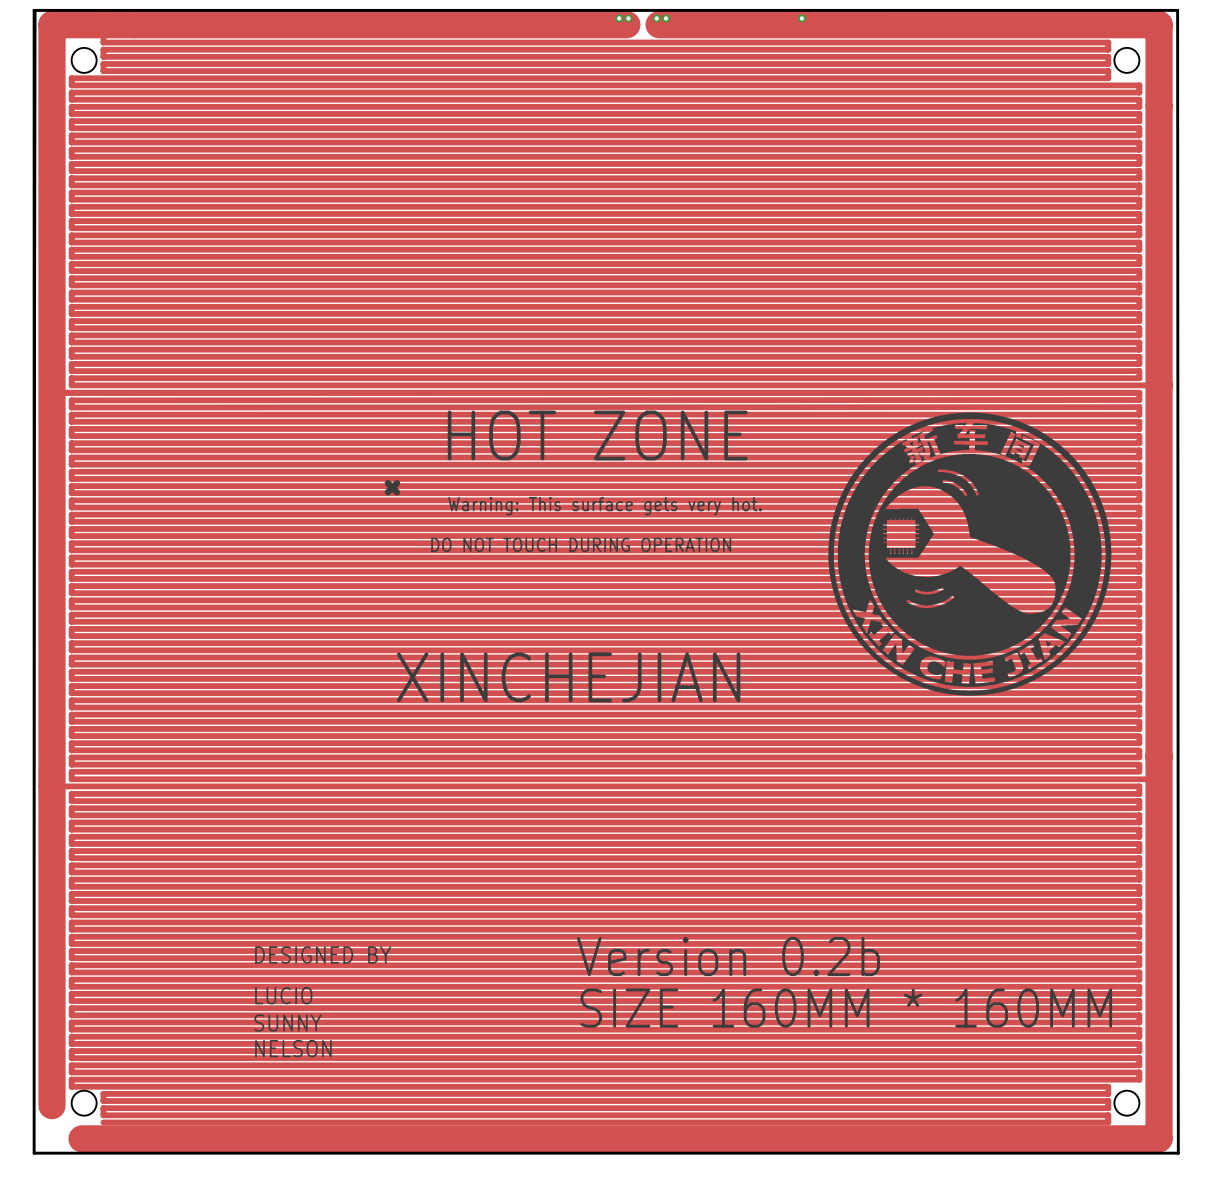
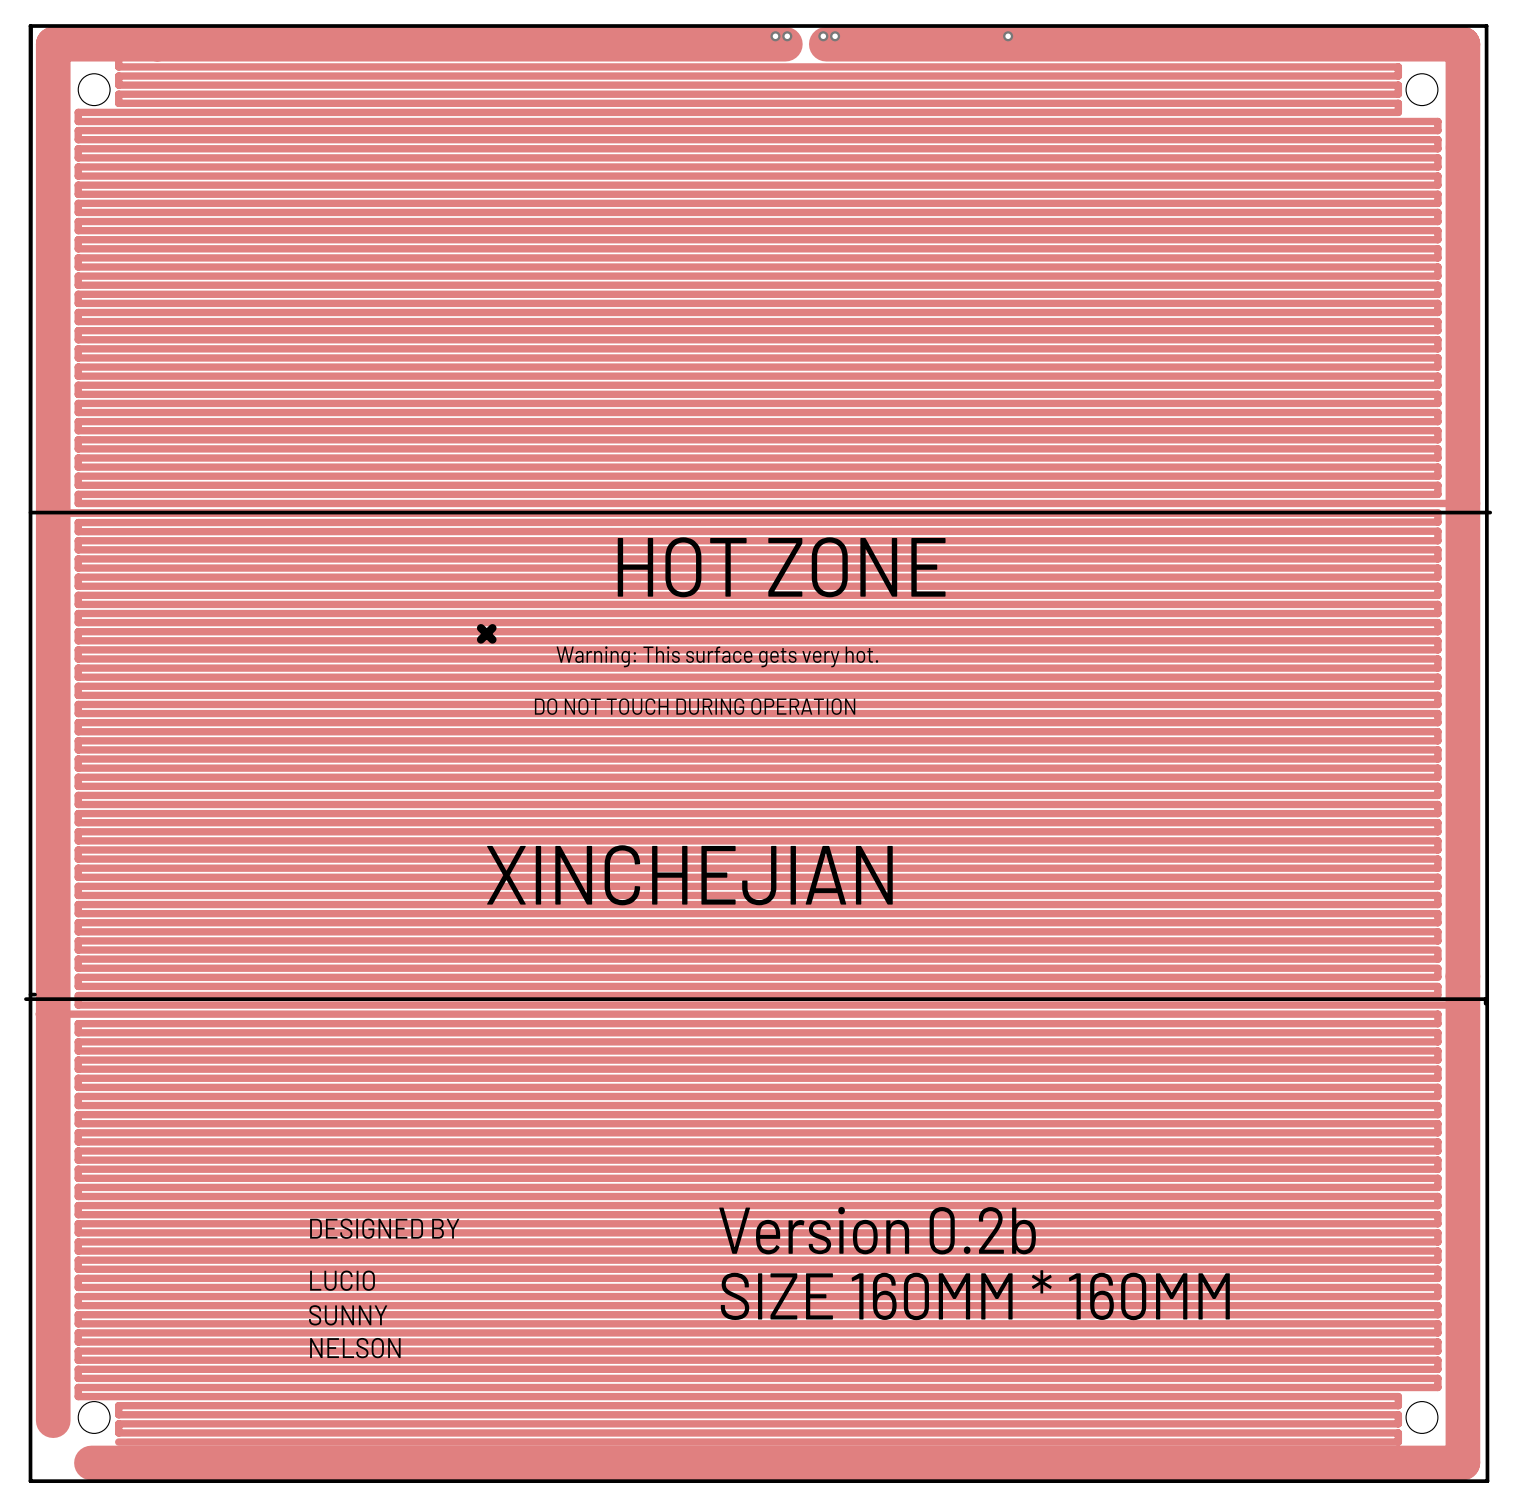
line: none -> (30, 512) (1490, 512)
drawing: [828, 412, 1112, 696] -> none
line: none -> (30, 994) (35, 994)
line: none -> (25, 999) (1485, 999) (1485, 1003)

